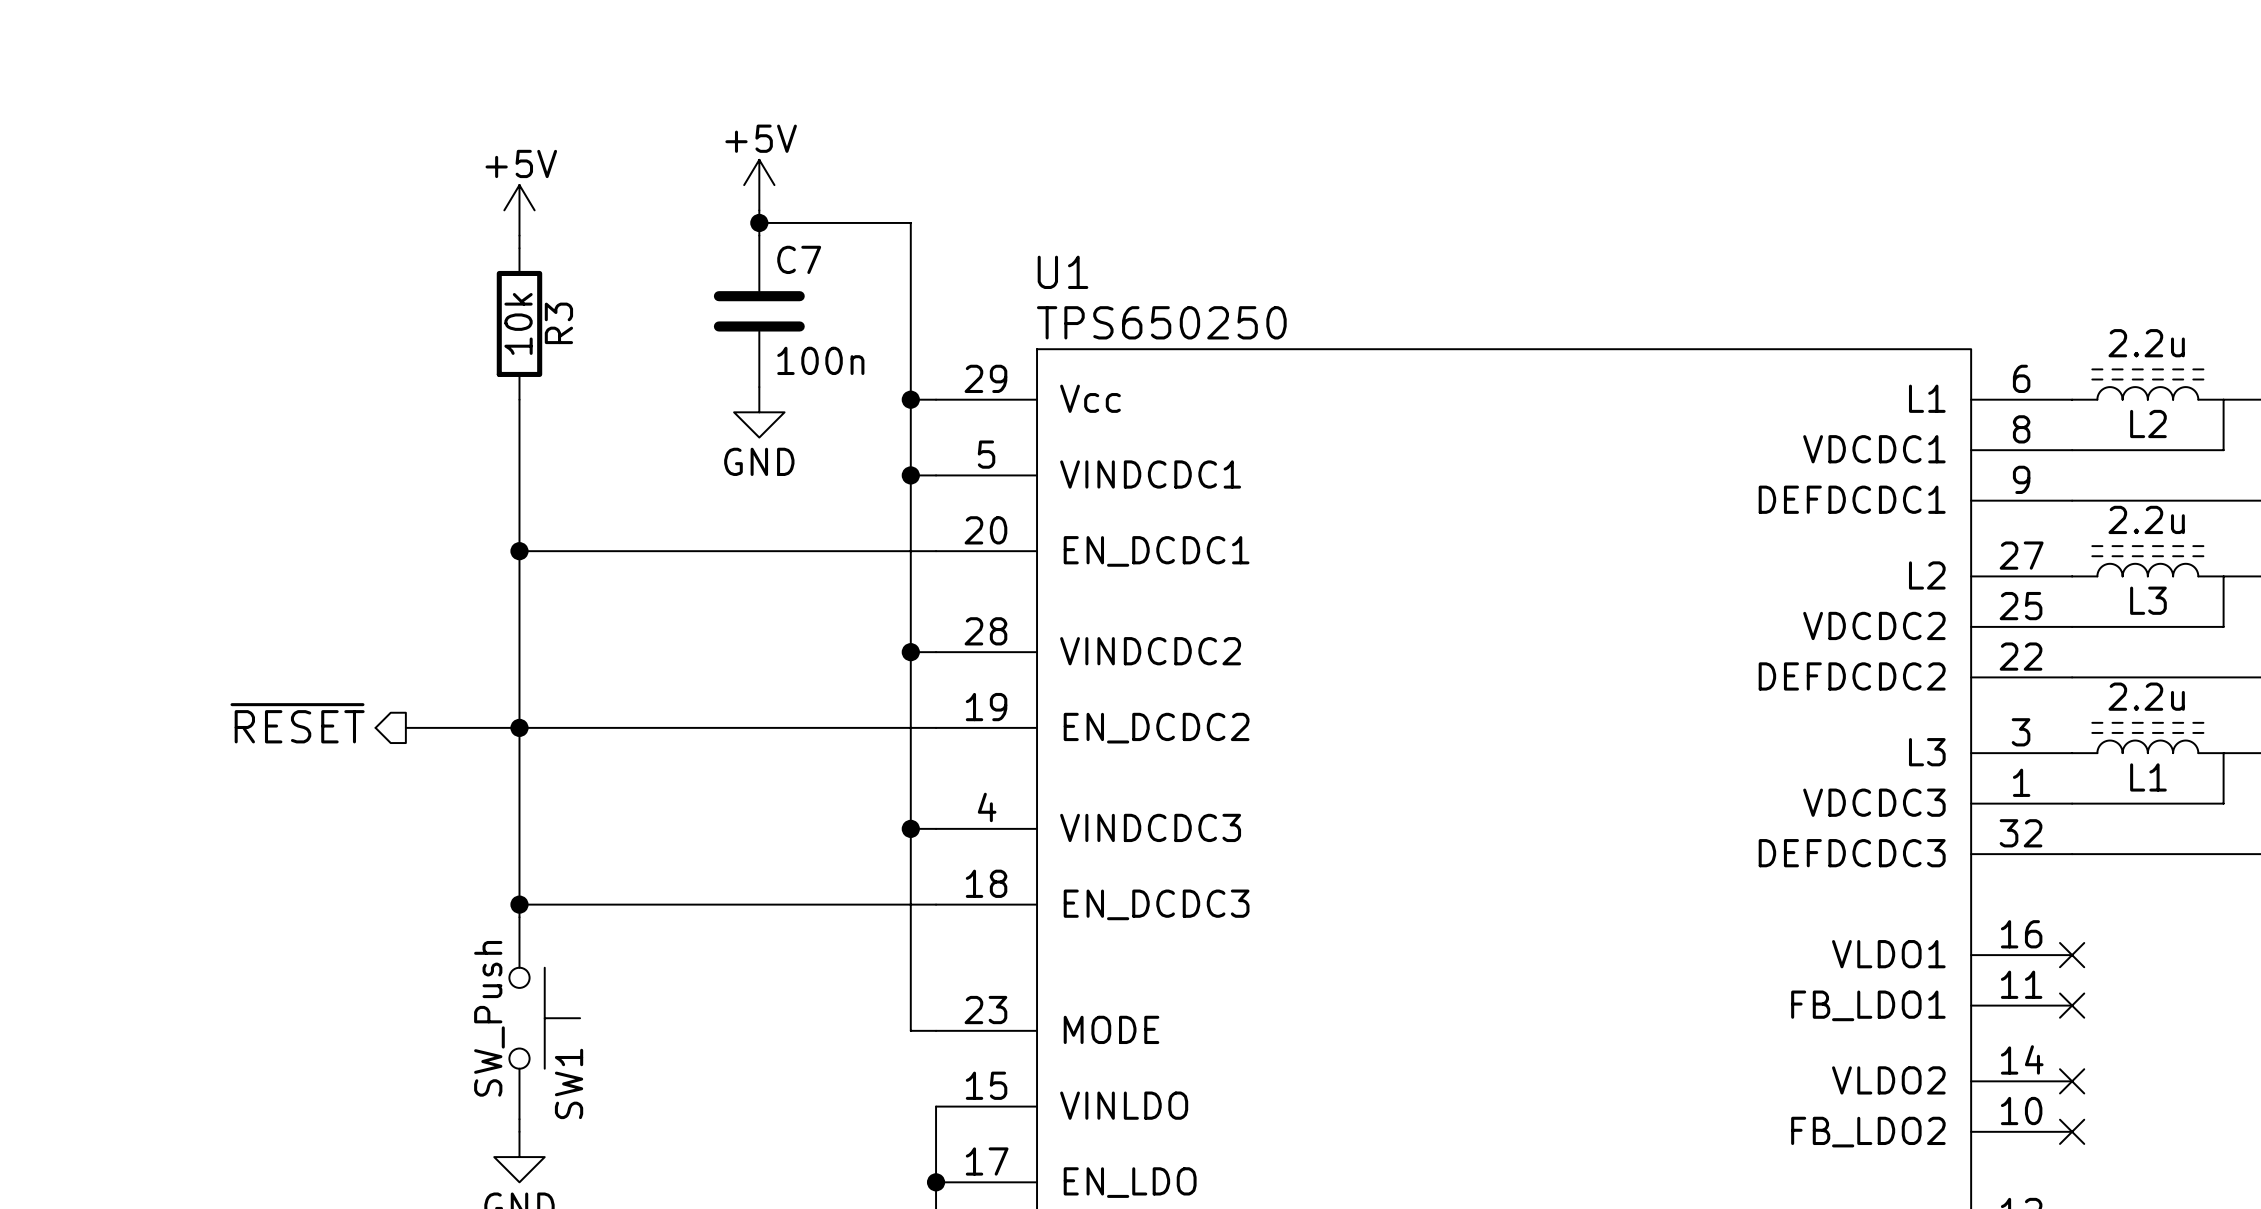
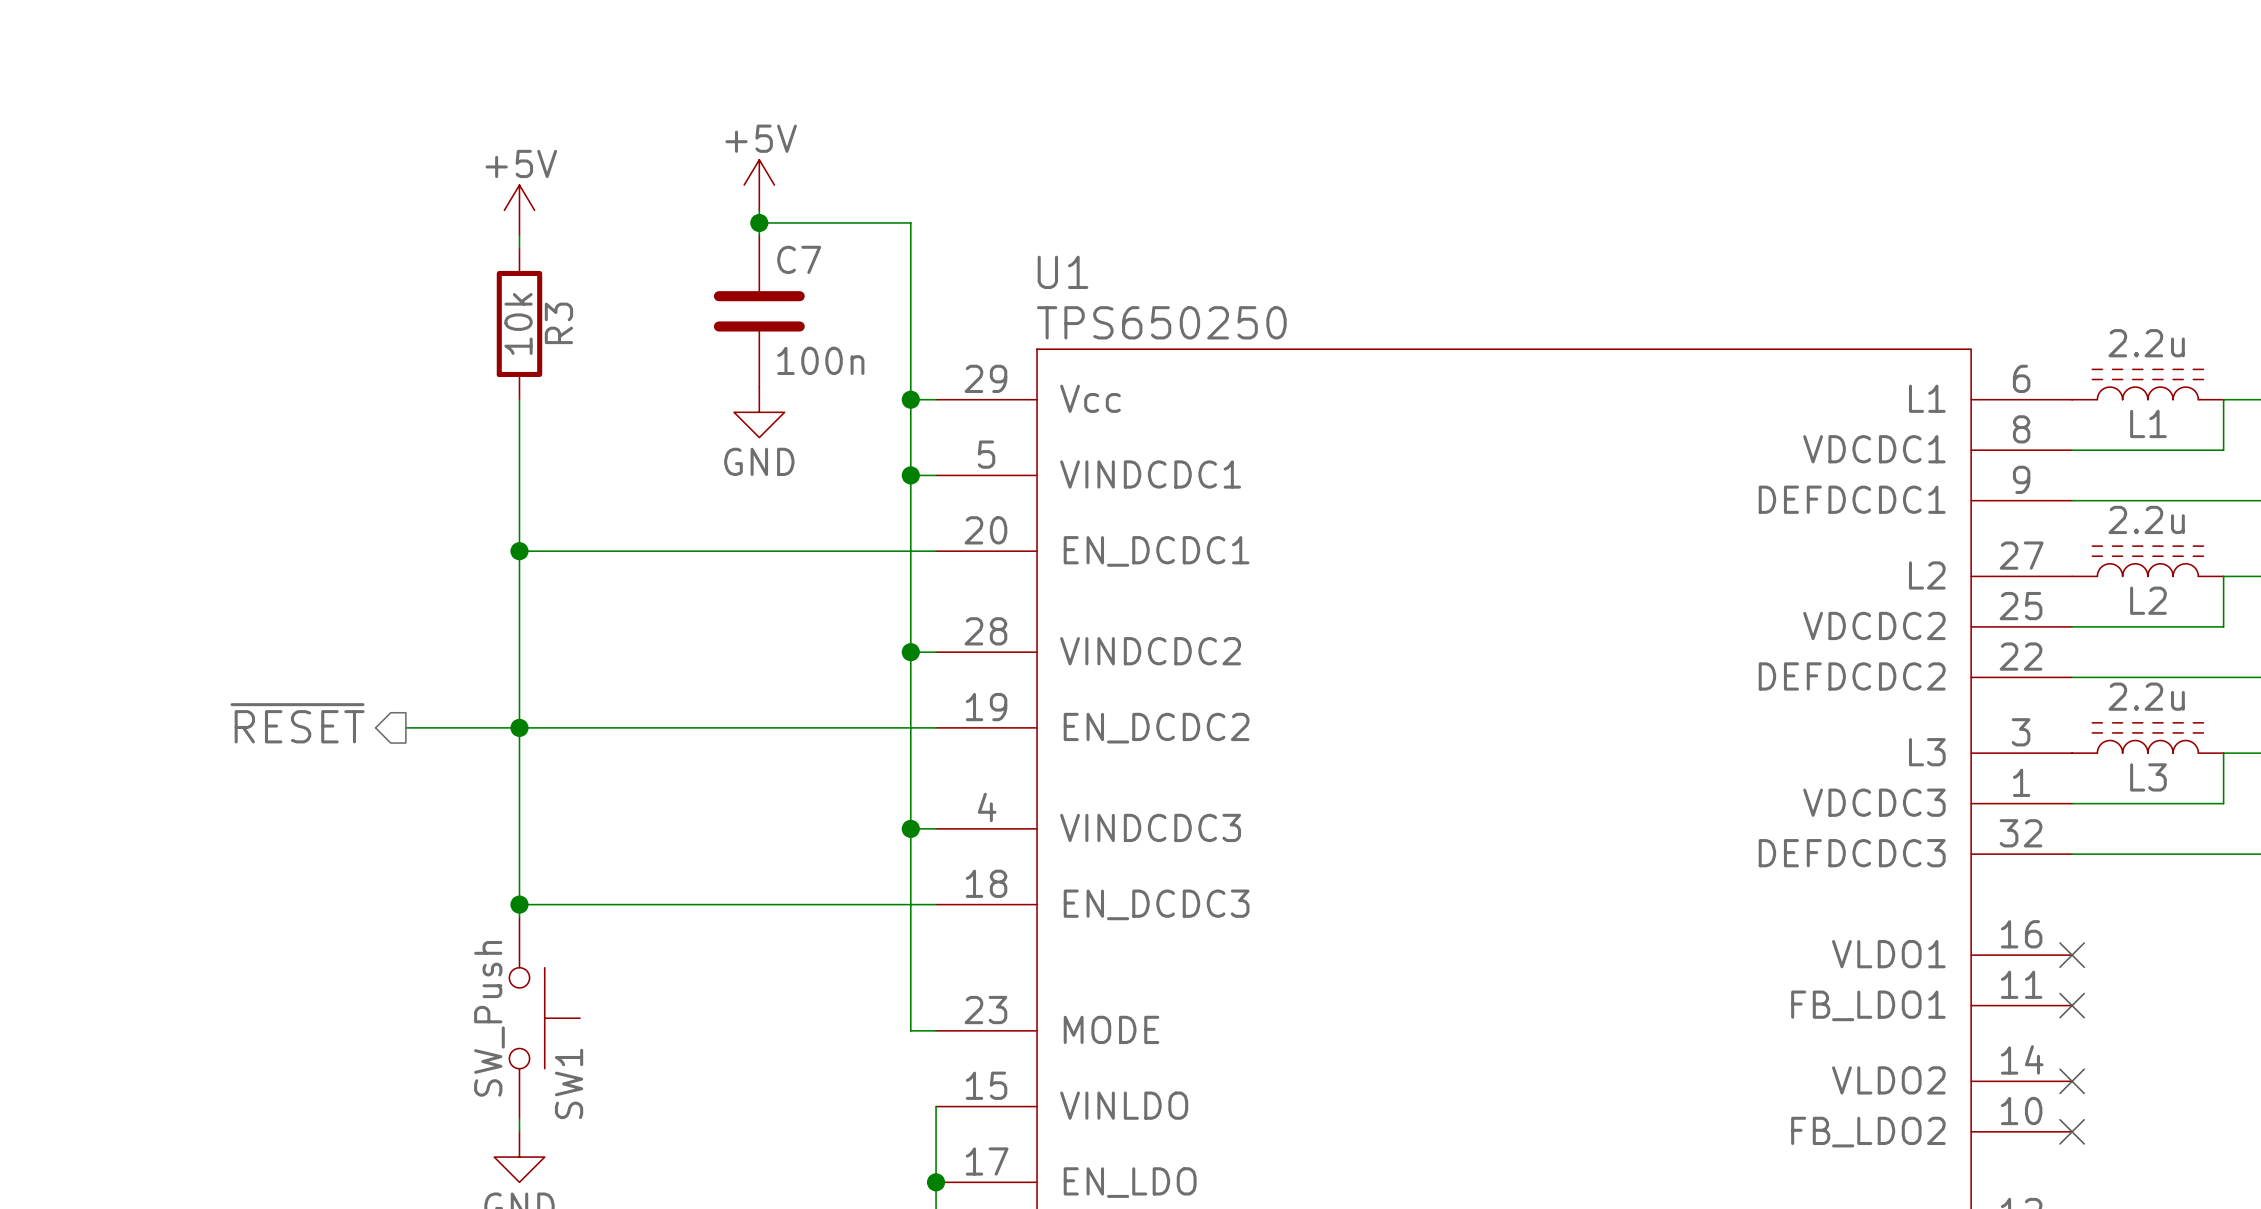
L2 name: L2 (2148, 423) -> L1 (2148, 423)
L3 name: L3 (2148, 600) -> L2 (2148, 600)
L1 name: L1 (2148, 777) -> L3 (2148, 777)

